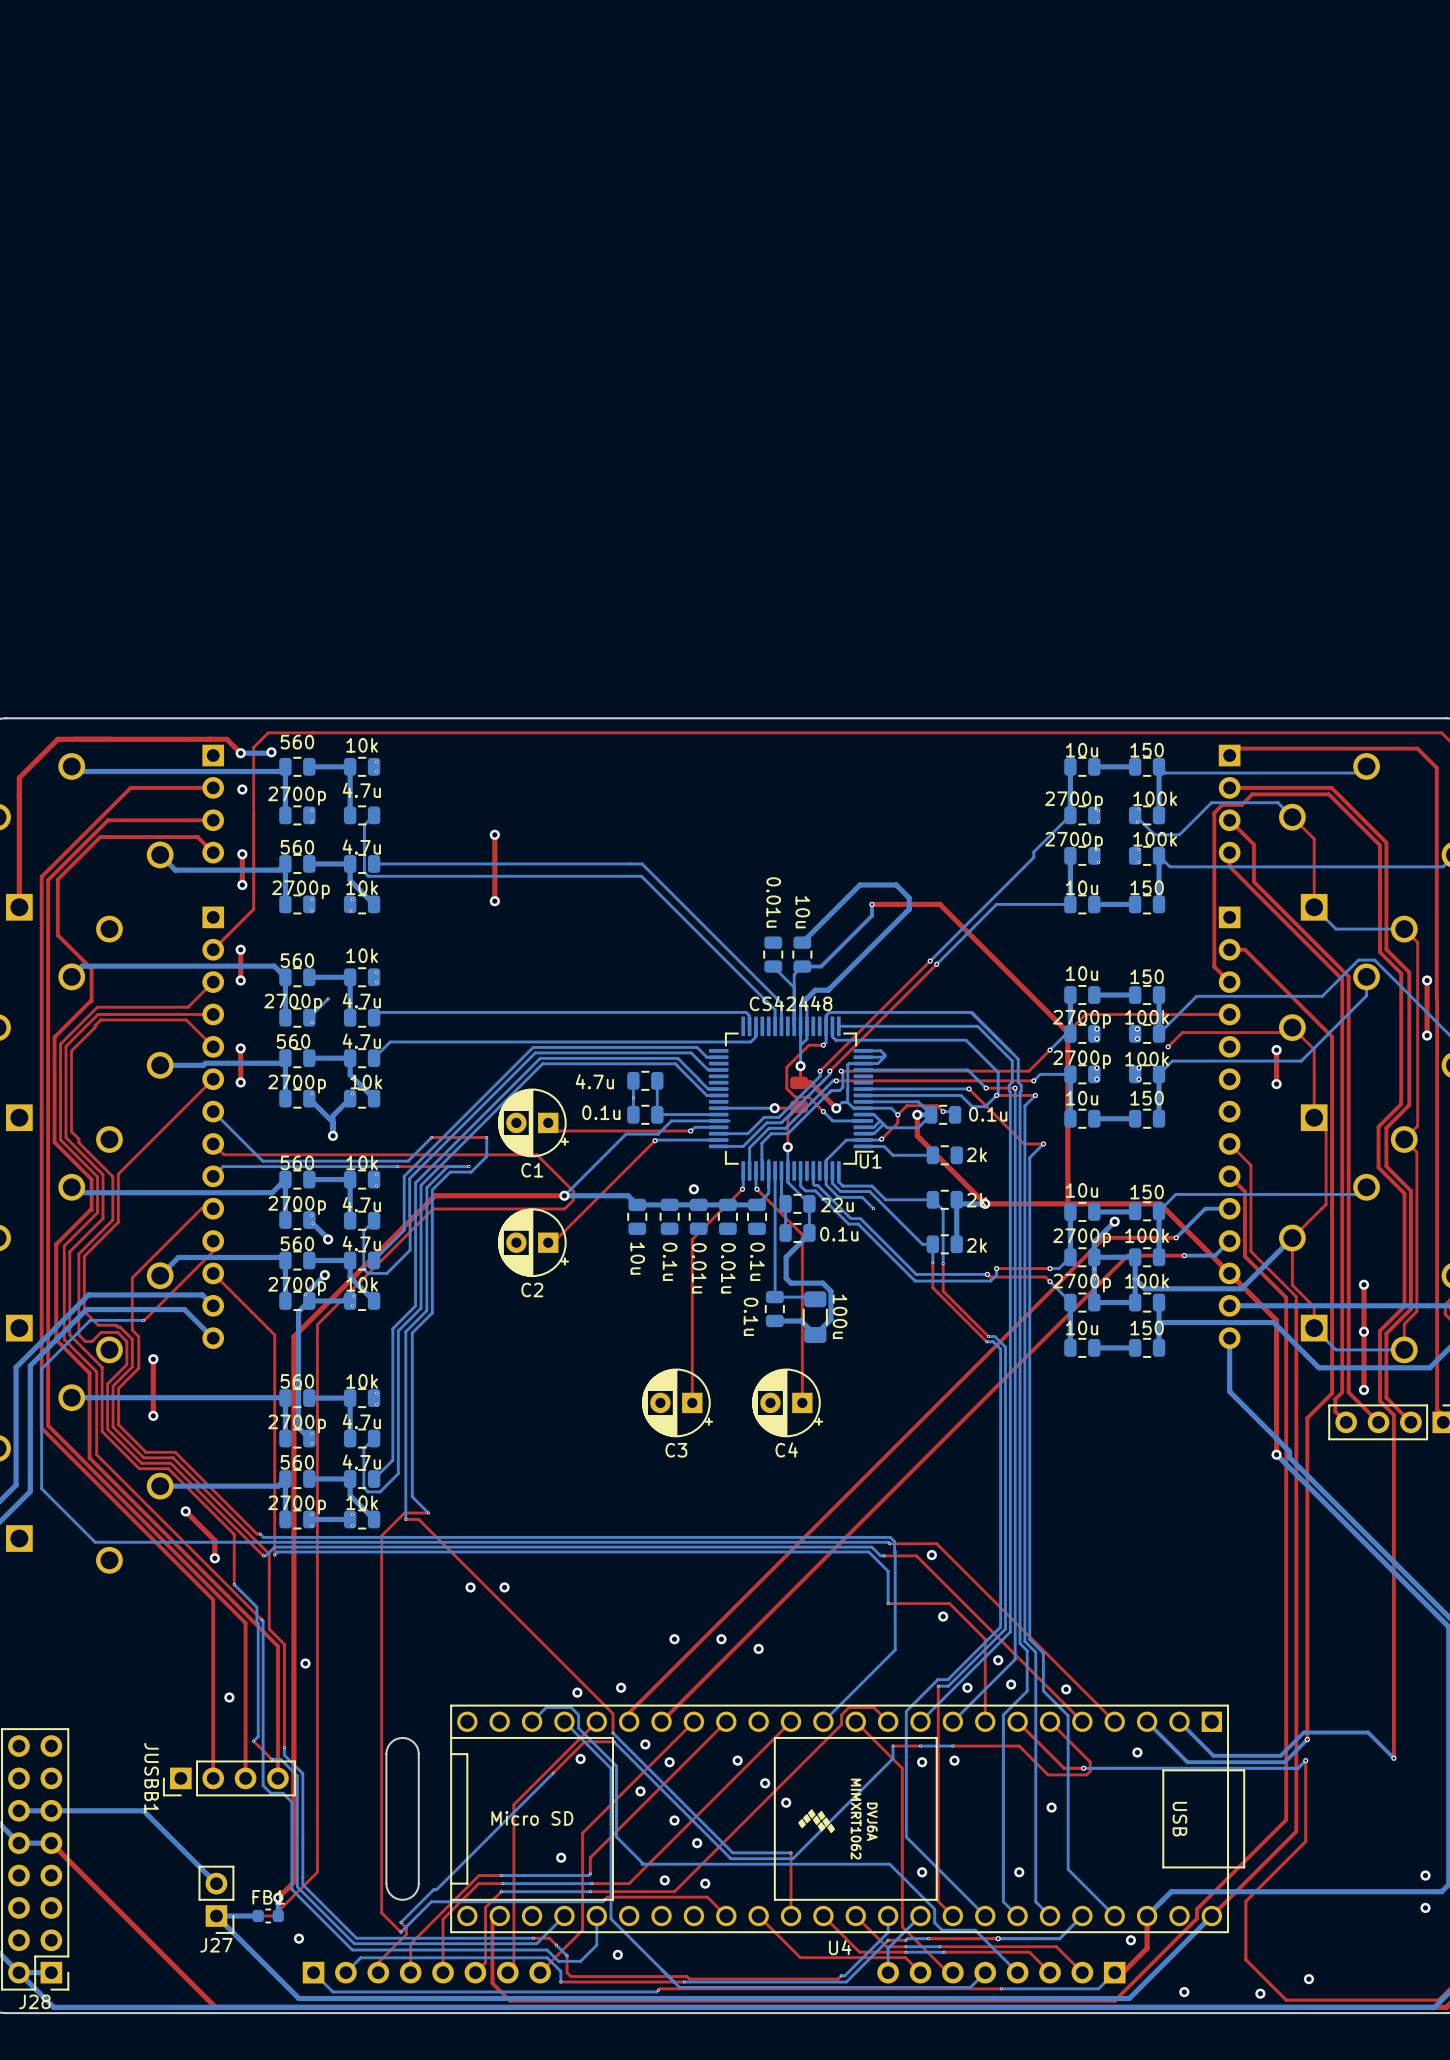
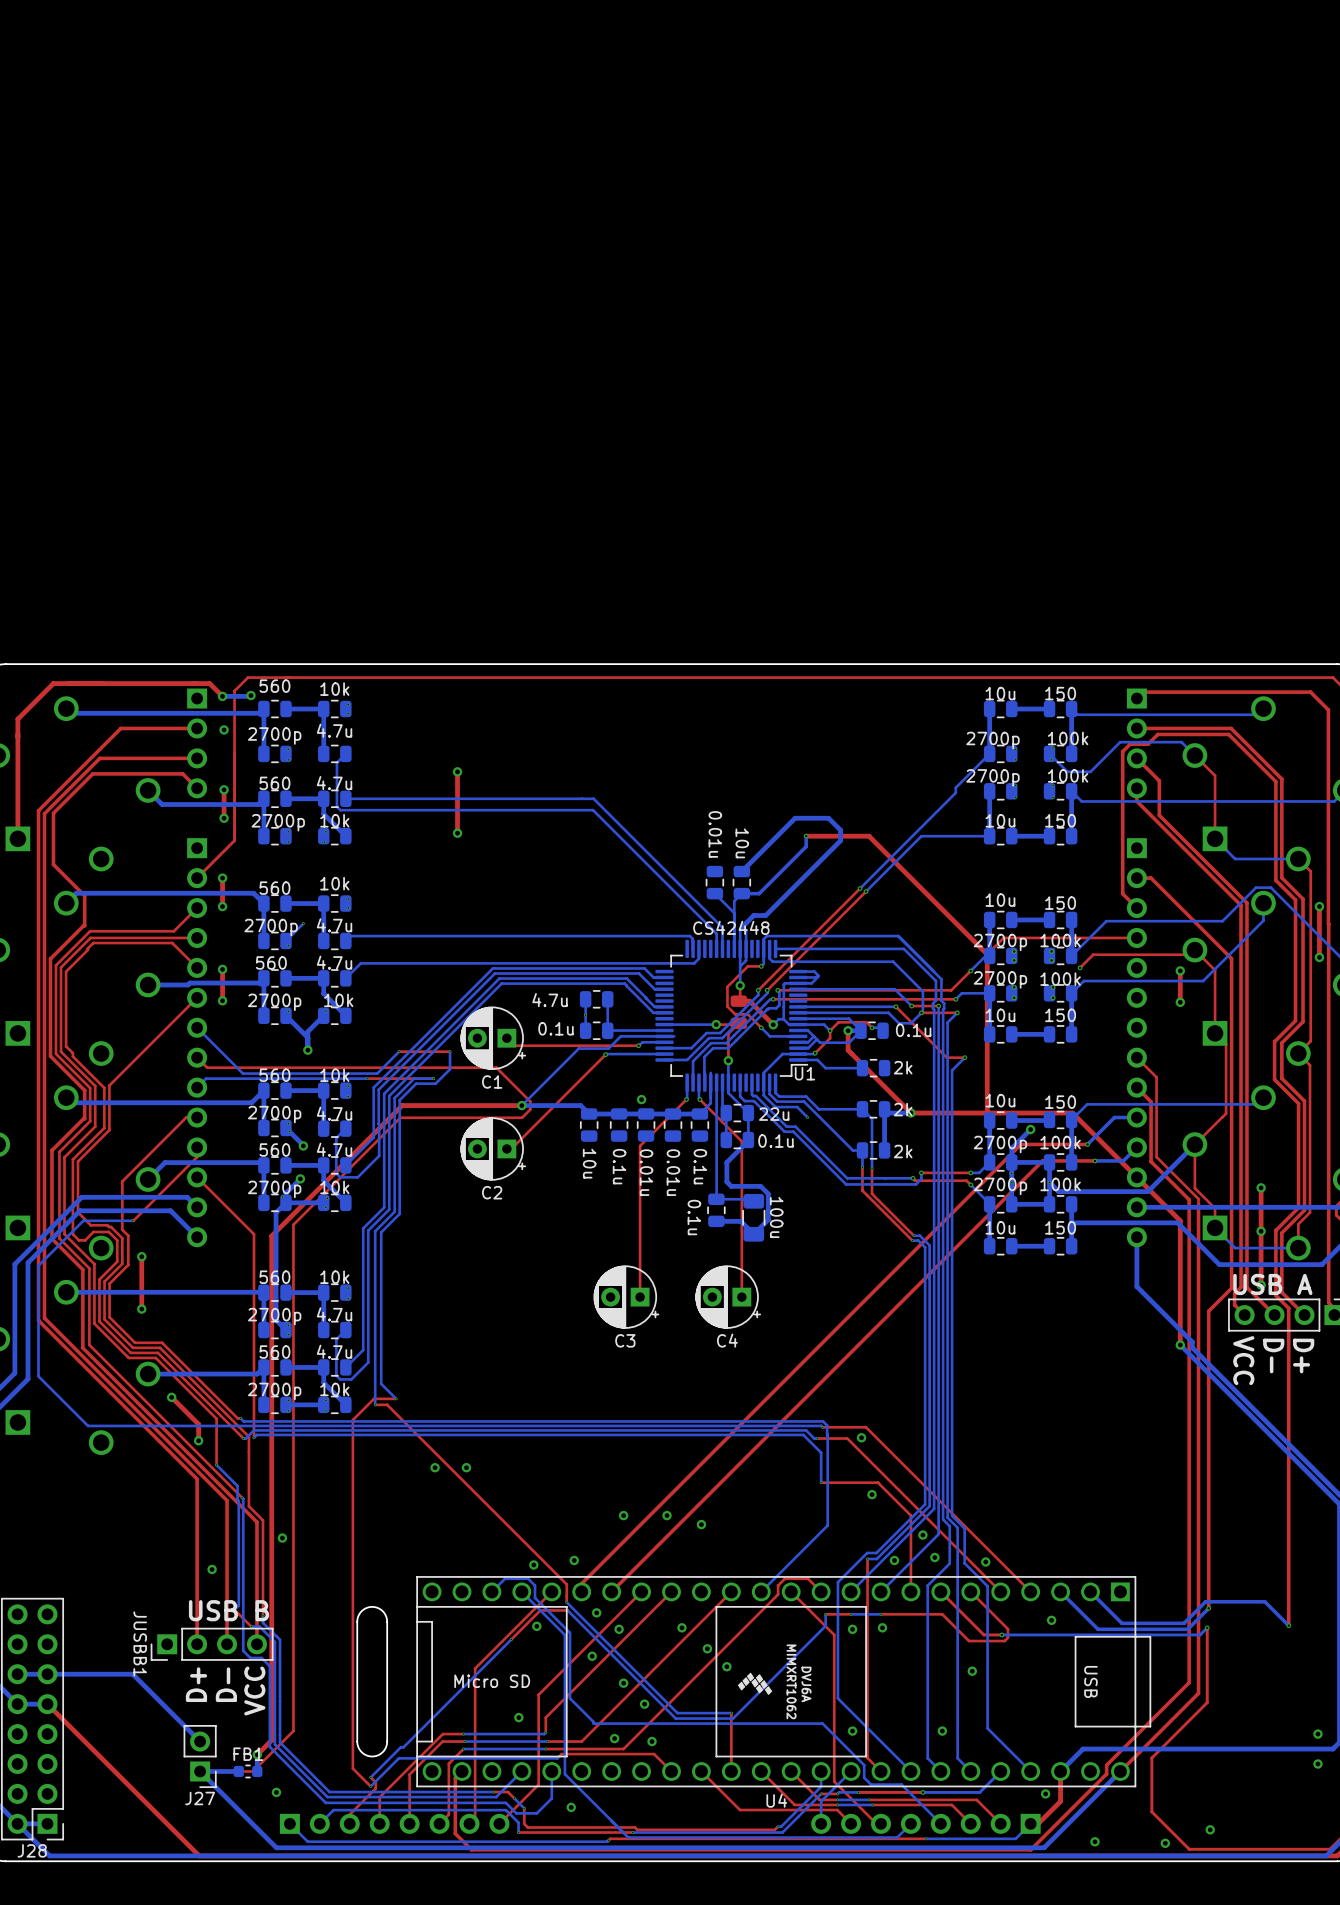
text: none -> USB A (1272, 1284)
text: none -> D- (1273, 1355)
text: none -> D+ (1303, 1355)
text: none -> VCC (1243, 1360)
text: none -> USB B (228, 1610)
text: none -> D+ (196, 1684)
text: none -> D- (226, 1684)
text: none -> VCC (254, 1691)

